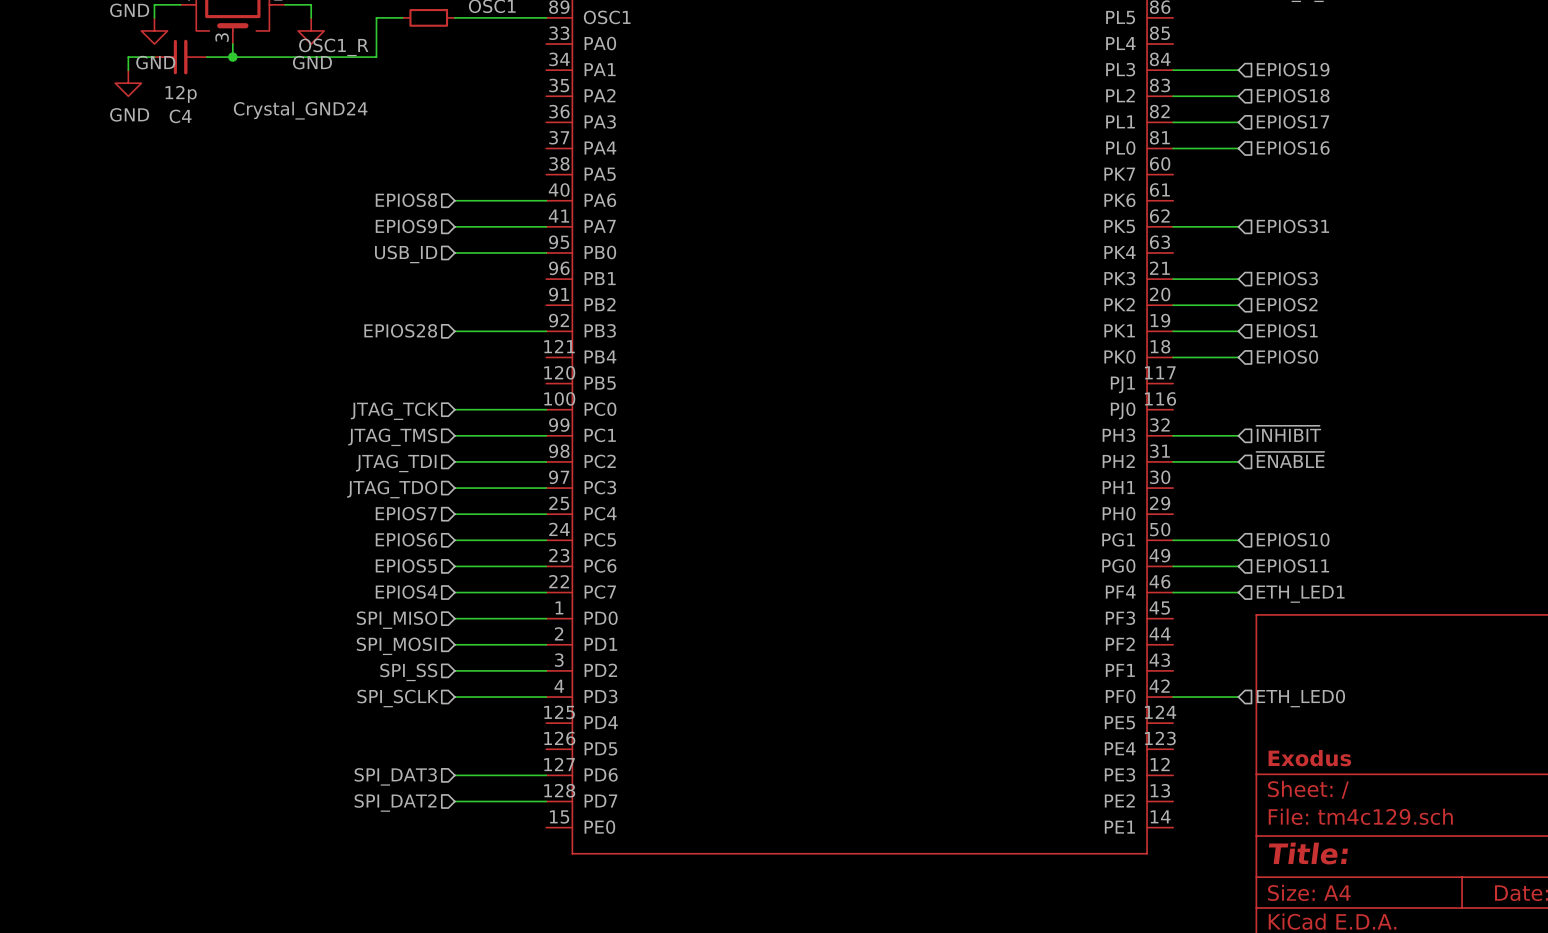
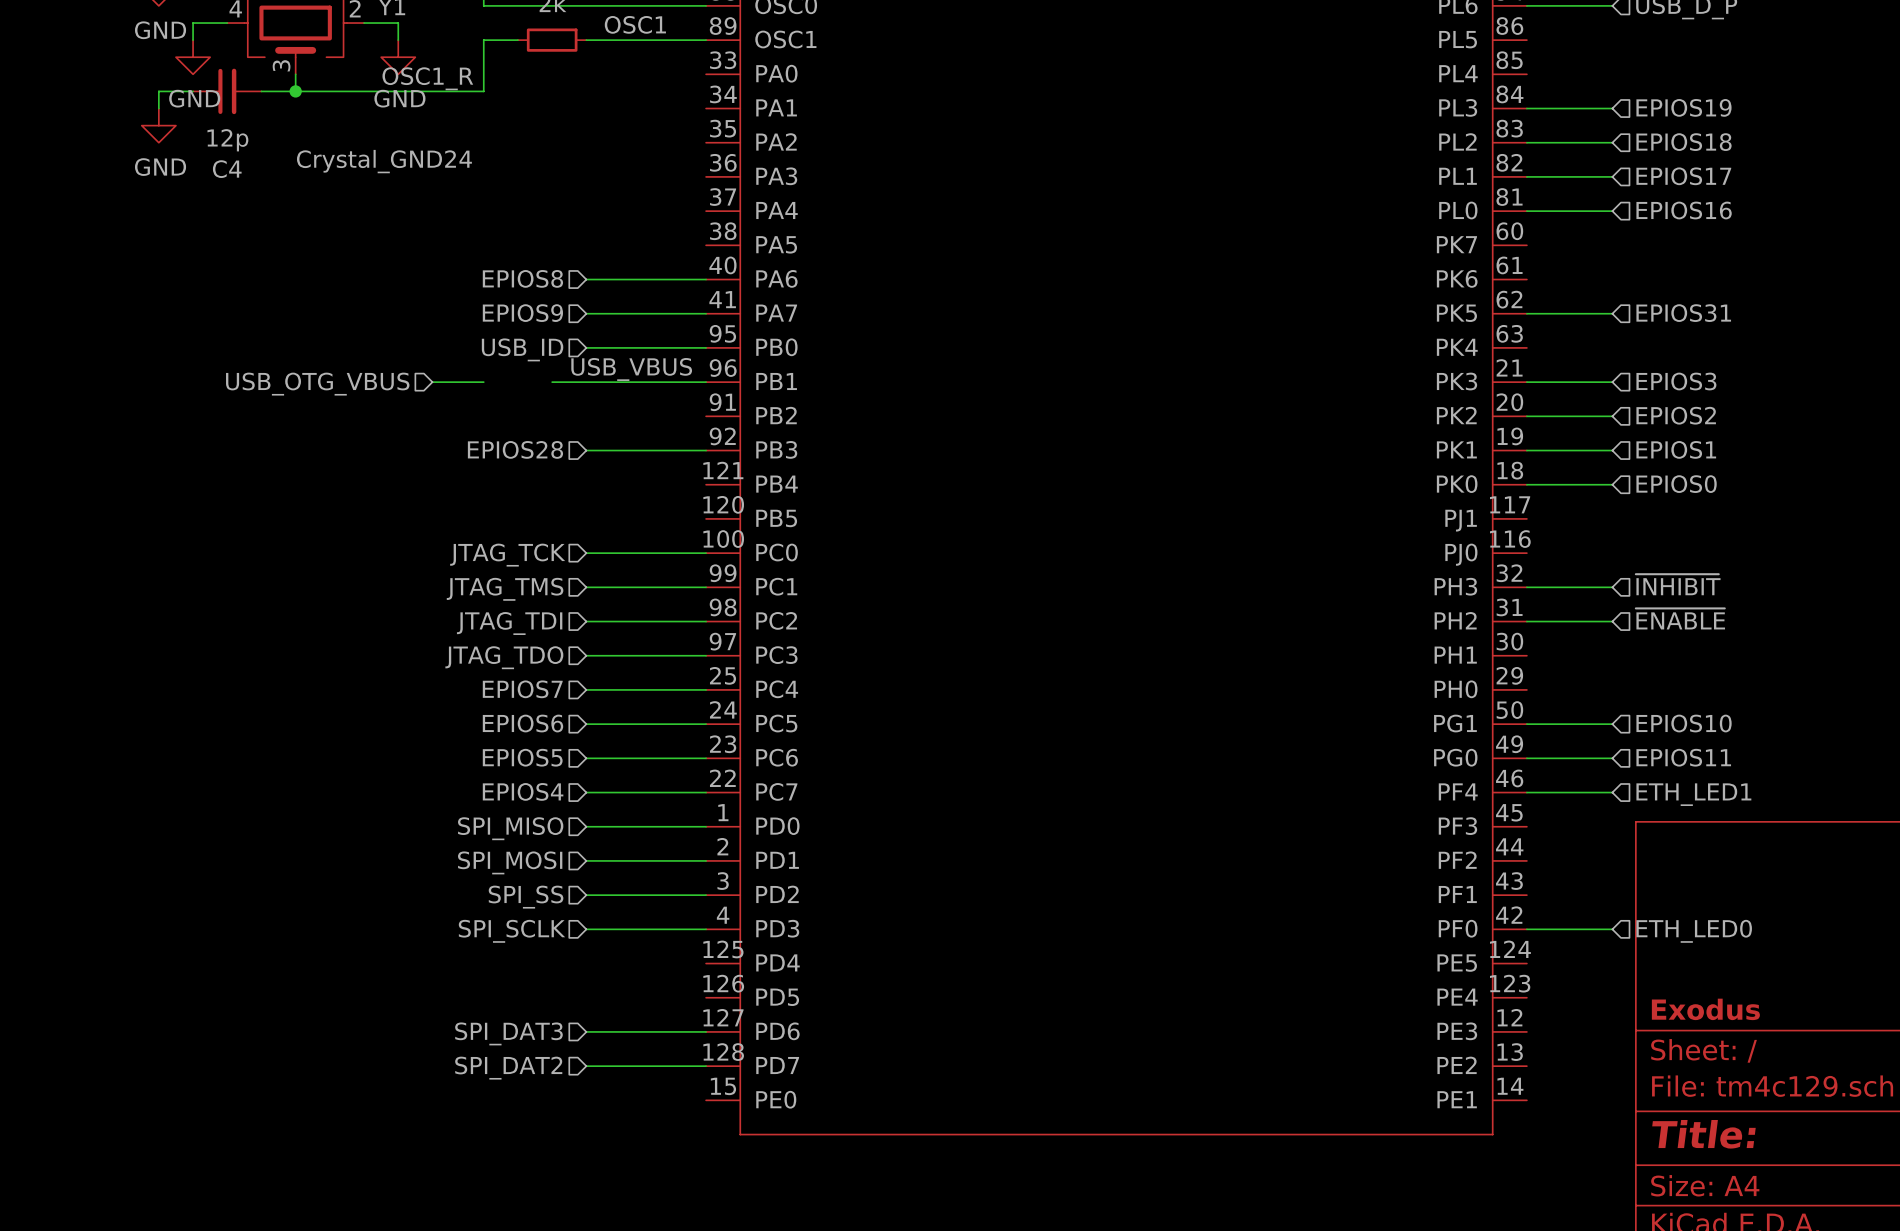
label: none -> USB_VBUS (631, 369)
wire: none -> (432, 382) (483, 382)
wire: none -> (552, 382) (706, 382)
hierarchical label: none -> USB_OTG_VBUS (317, 384)

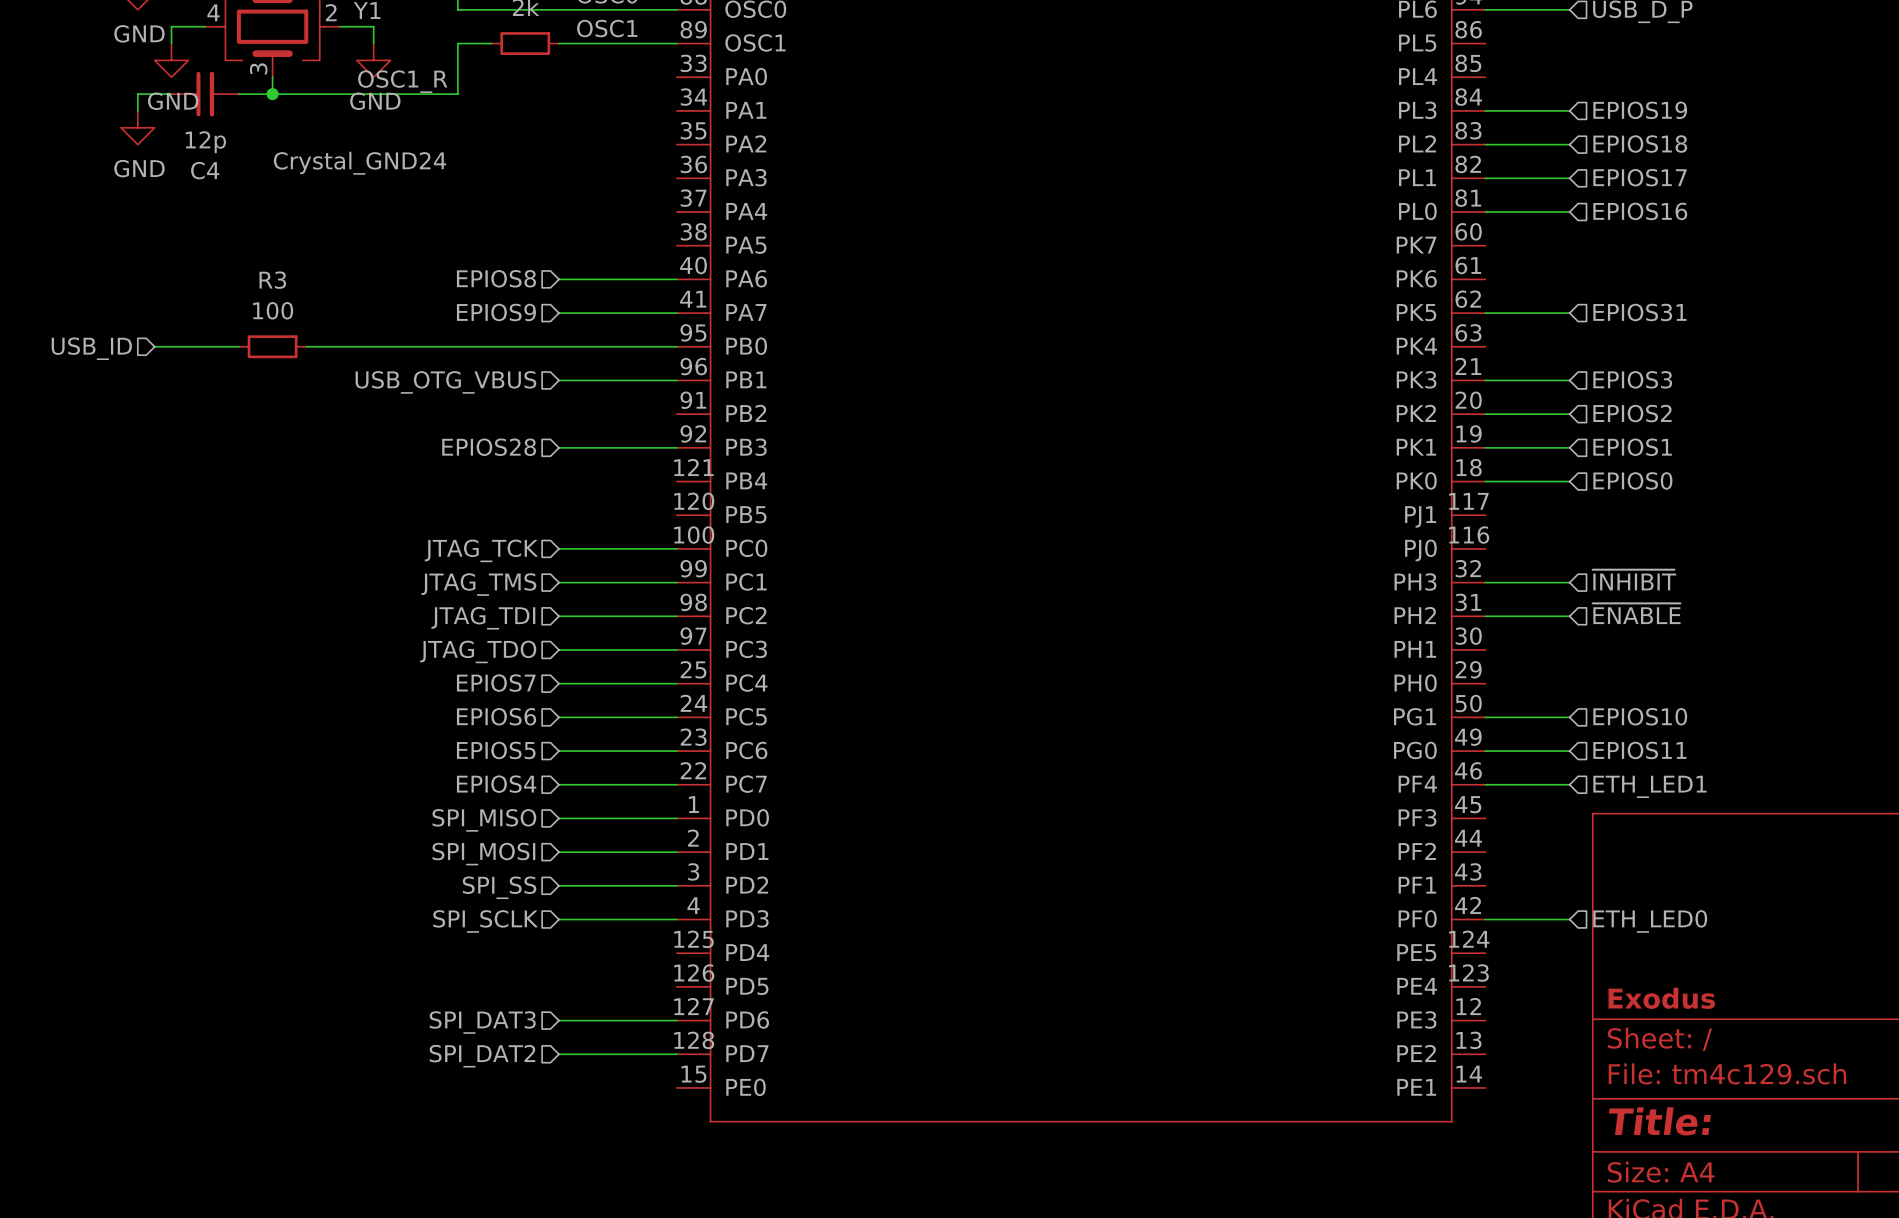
wire: none -> (154, 346) (238, 346)
R3: none -> 100 (272, 346)
wire: none -> (306, 346) (558, 346)
hierarchical label: none -> USB_ID (91, 348)
hierarchical label: USB_ID (522, 349) -> none
label: USB_VBUS (631, 369) -> none
wire: (432, 382) (483, 382) -> none
wire: (552, 382) (586, 382) -> none
hierarchical label position: USB_OTG_VBUS (317, 384) -> USB_OTG_VBUS (445, 382)

